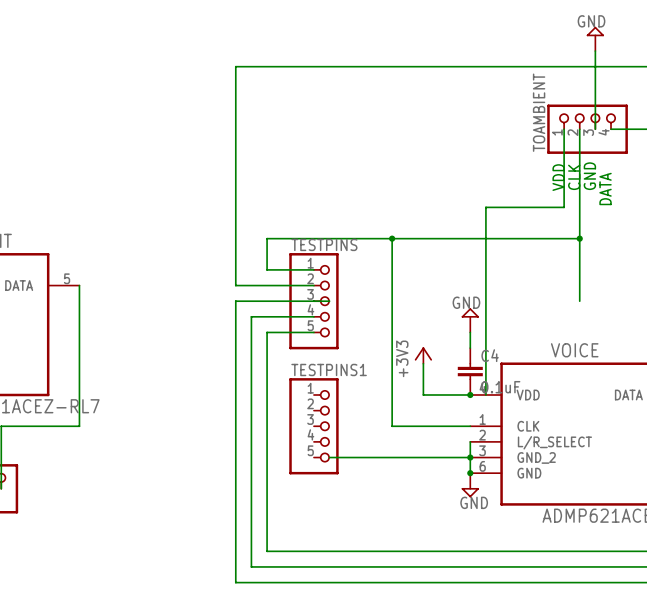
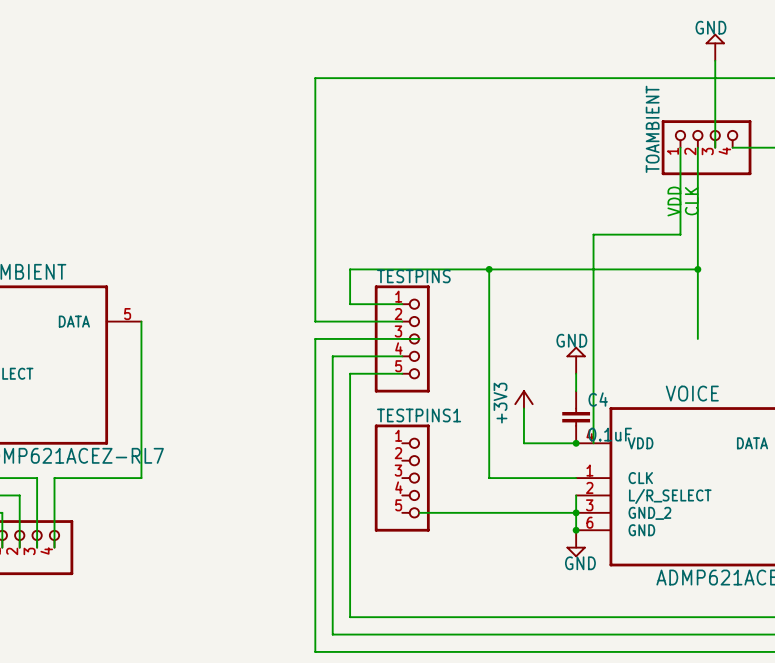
text: GND (589, 176) -> none
text: DATA (605, 188) -> none

